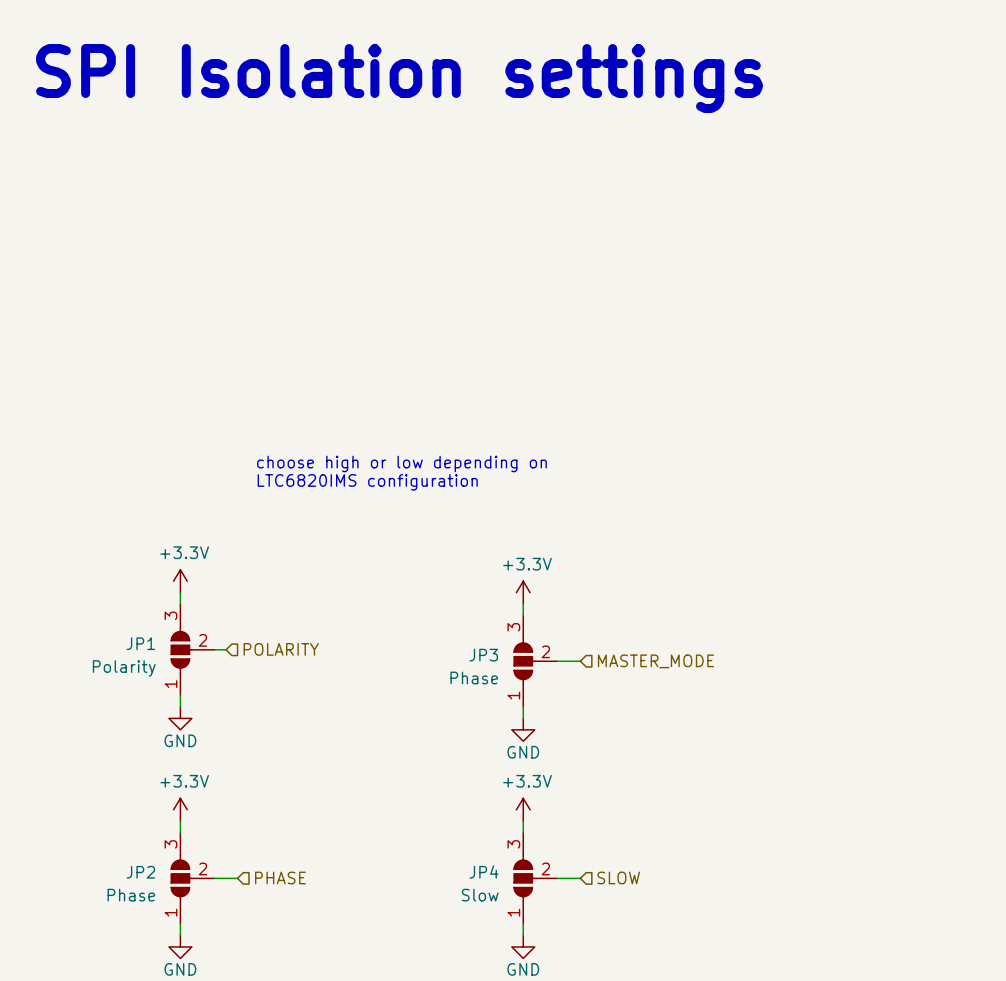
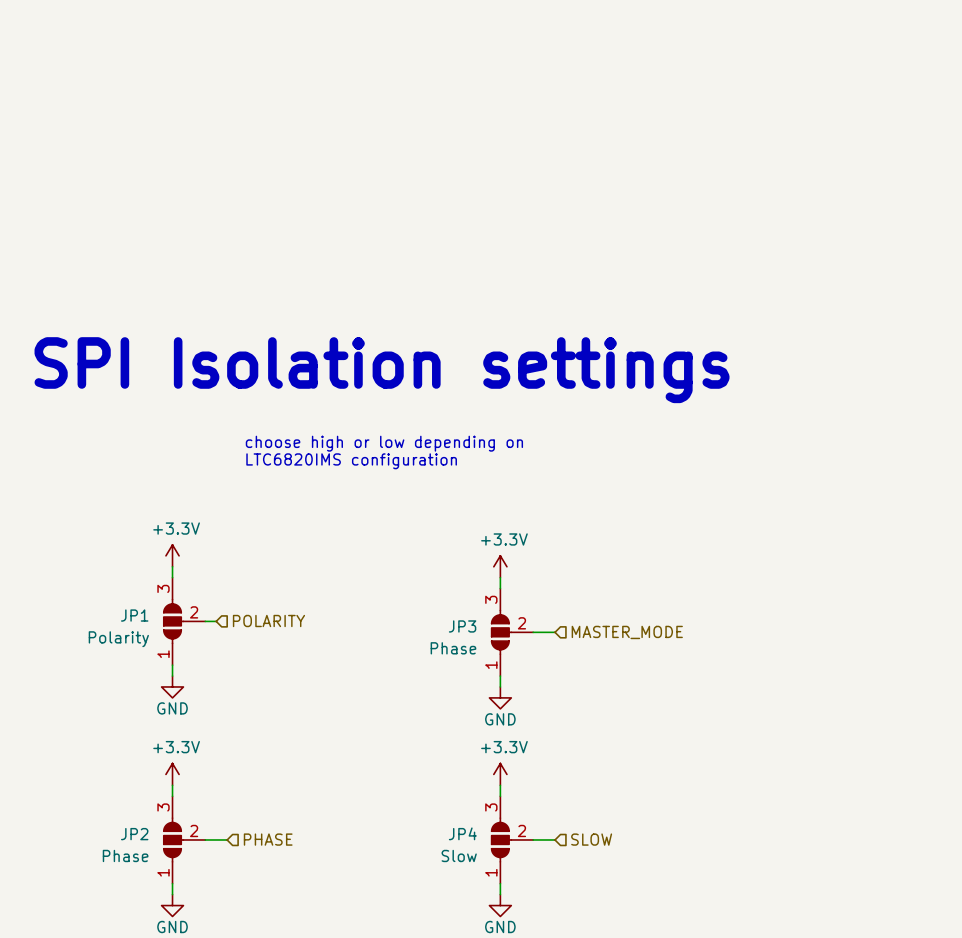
text: SPI Isolation settings (399, 78) -> none
text: none -> SPI Isolation settings (382, 370)

